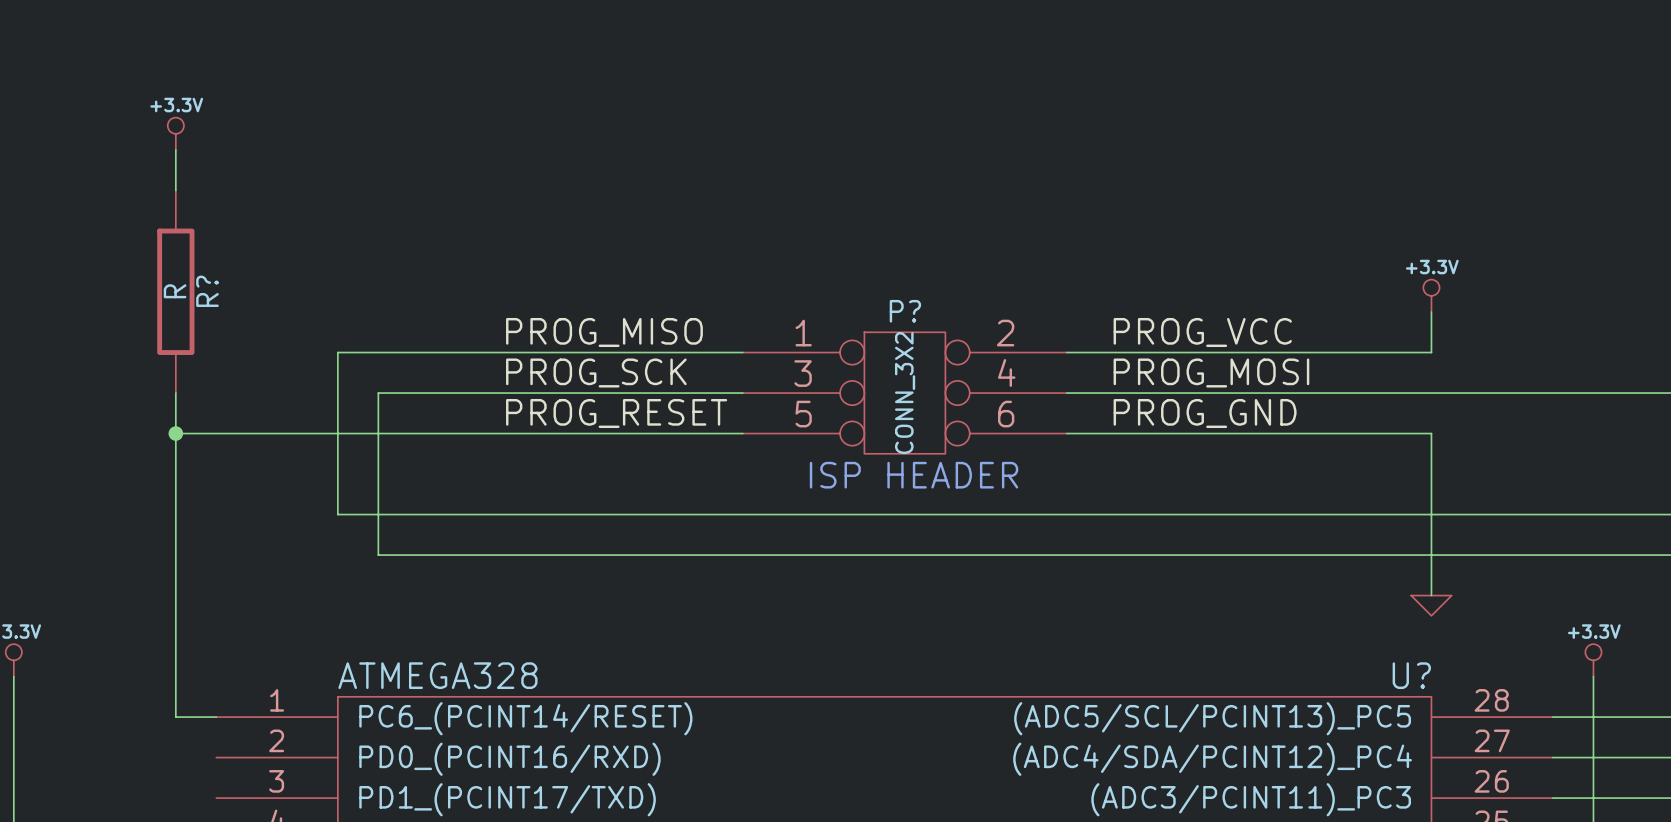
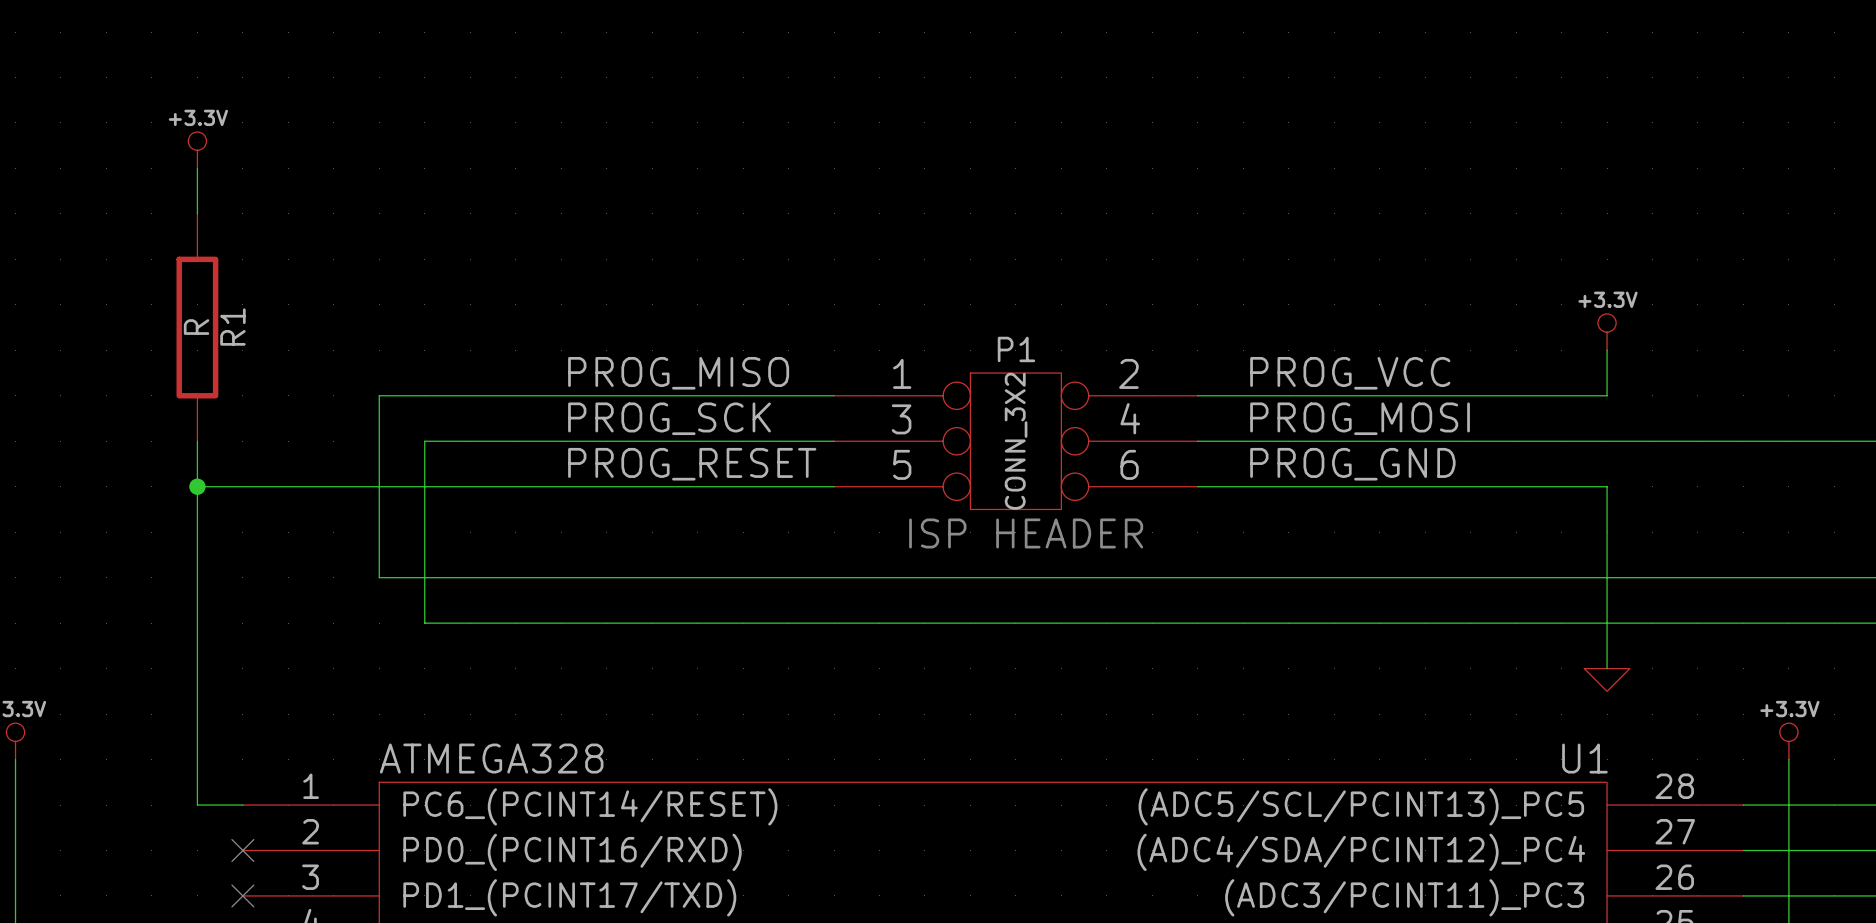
R? name: R? (207, 291) -> R1 (232, 327)
P? name: P? (905, 311) -> P1 (1016, 349)
U? name: U? (1411, 675) -> U1 (1584, 758)
no-connect mark: none -> (242, 850)
no-connect mark: none -> (242, 895)

